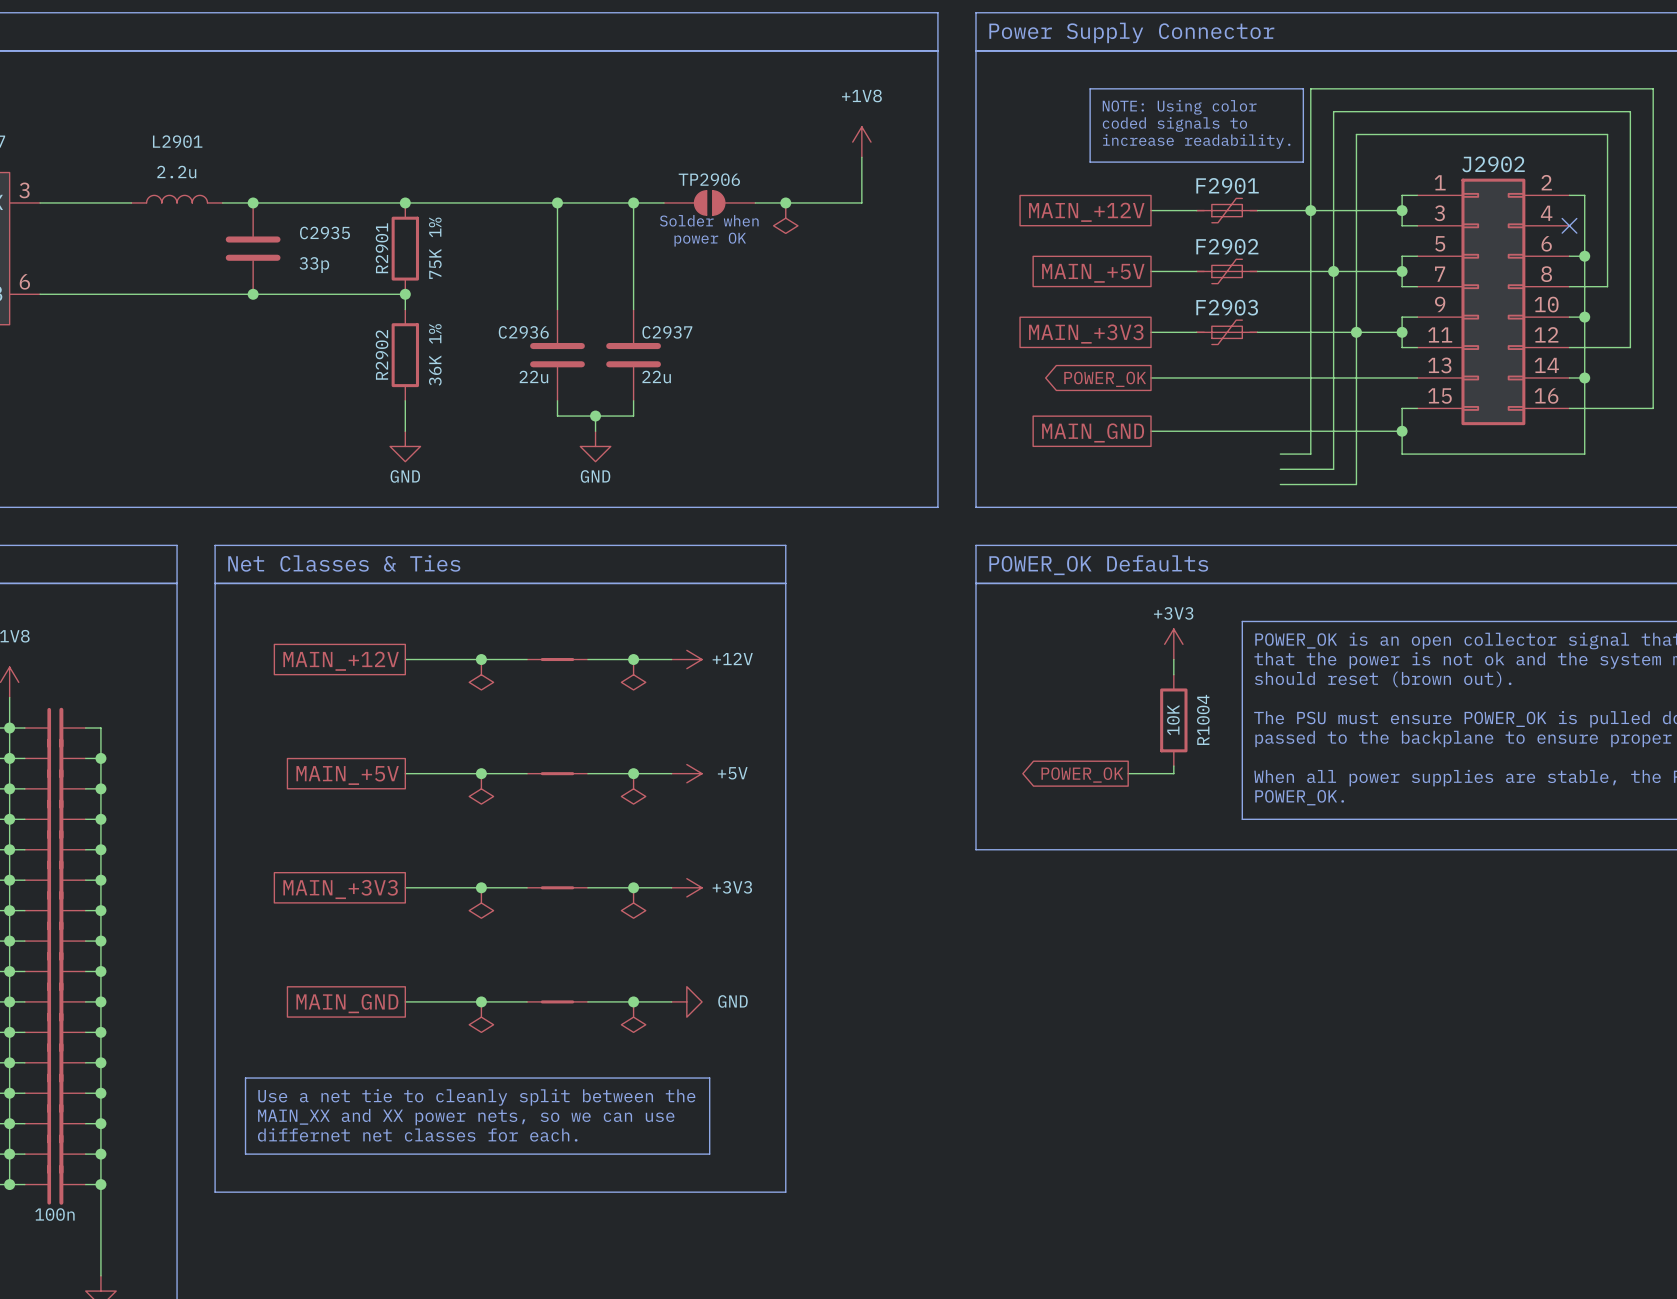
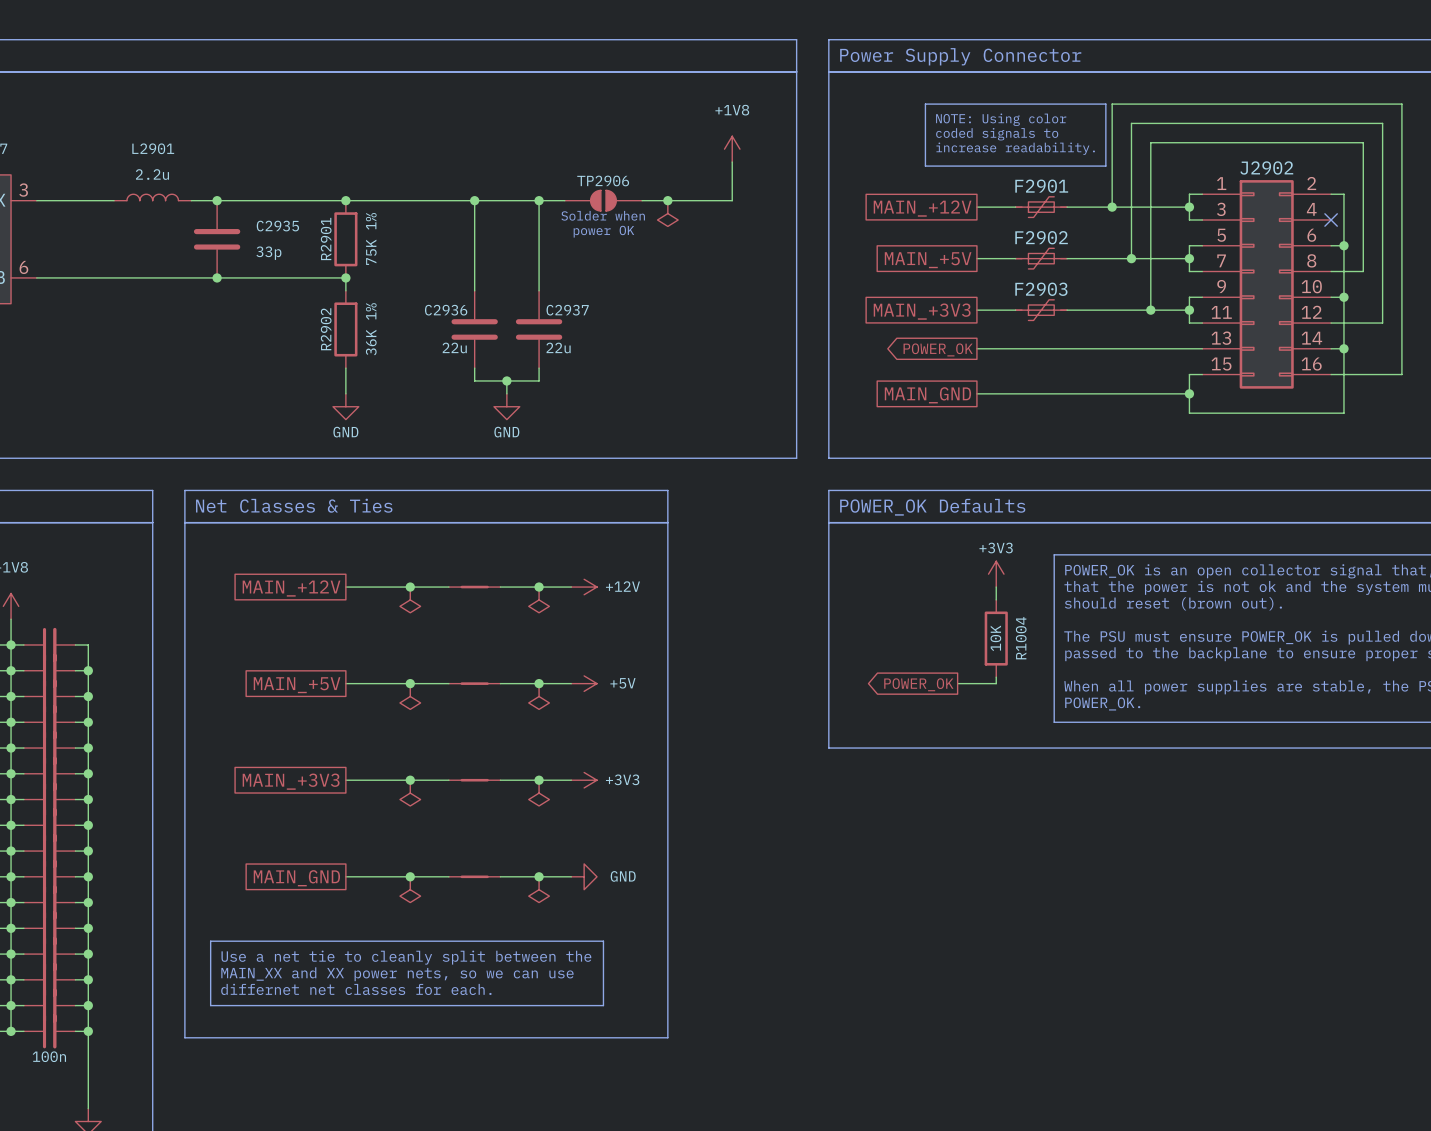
wire: (1310, 210) (1310, 454) (1280, 454) -> none
wire: (1333, 271) (1333, 469) (1280, 469) -> none
wire: (1356, 332) (1356, 484) (1280, 484) -> none

